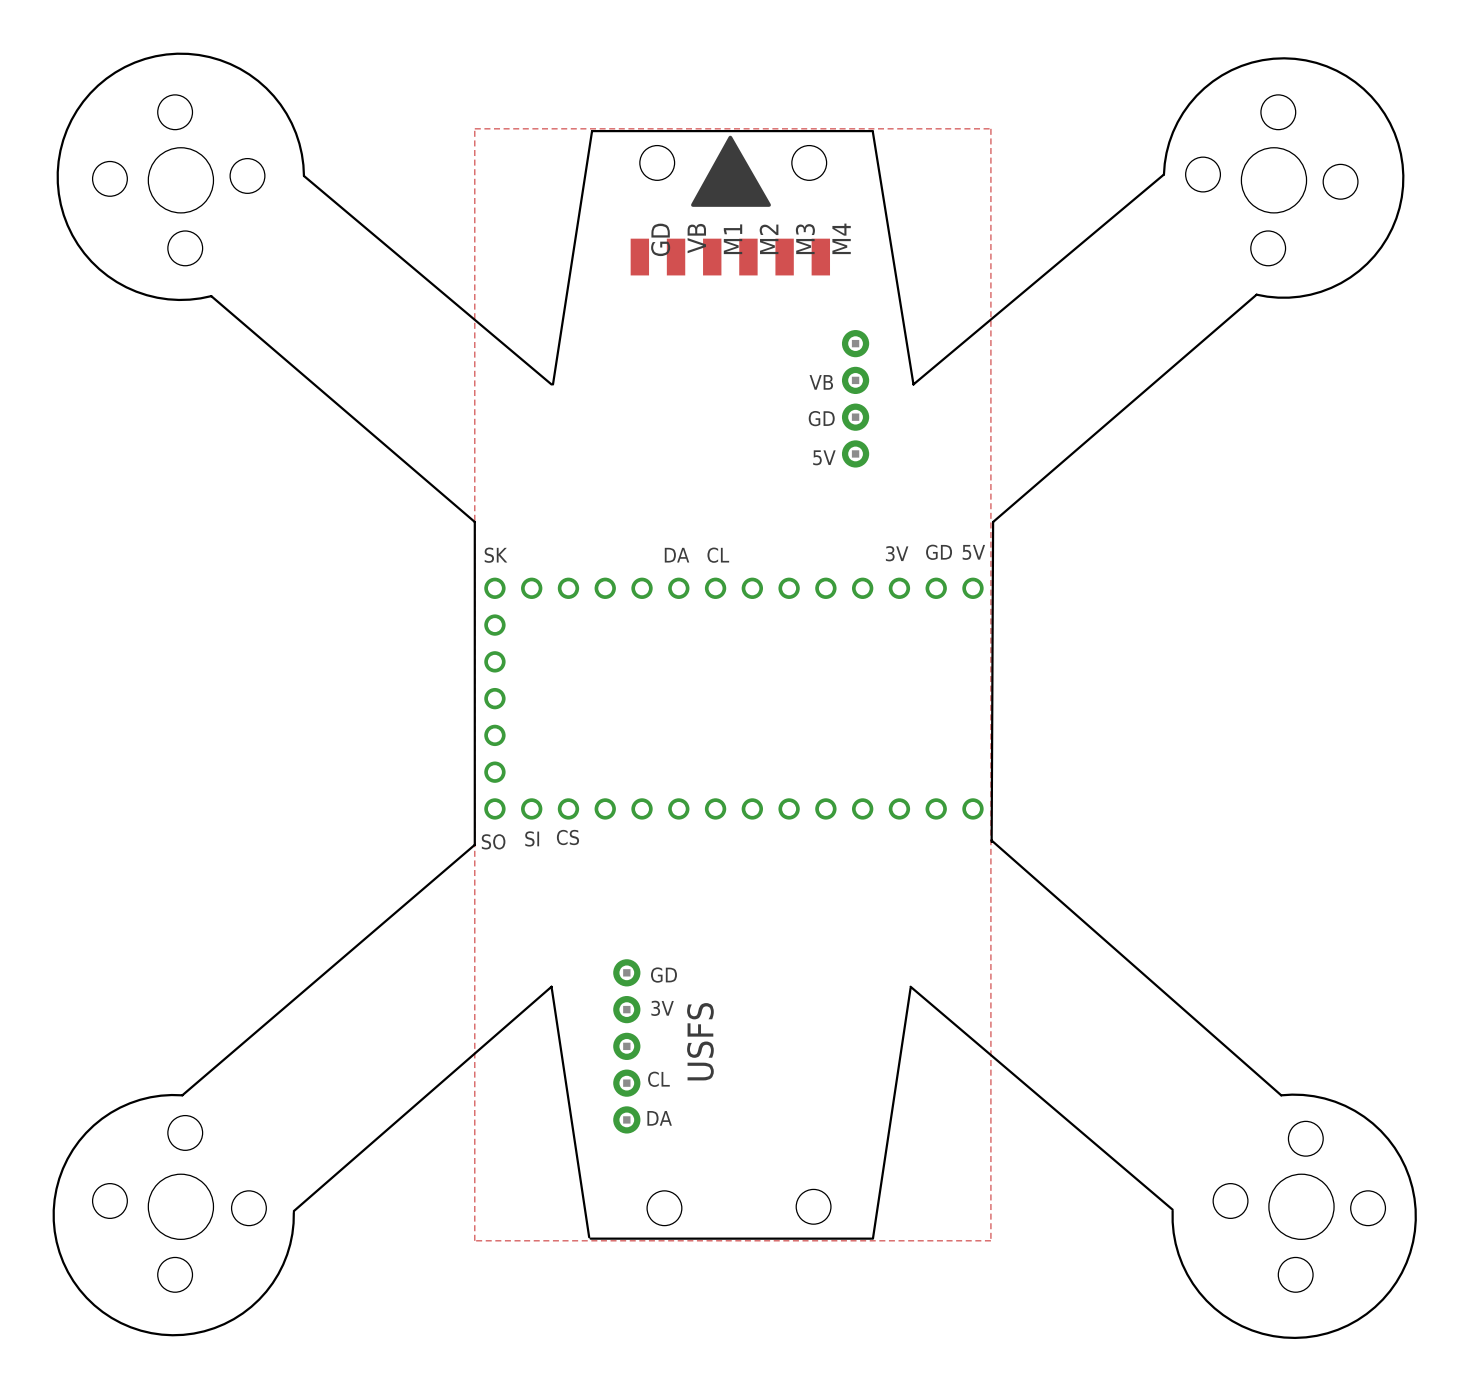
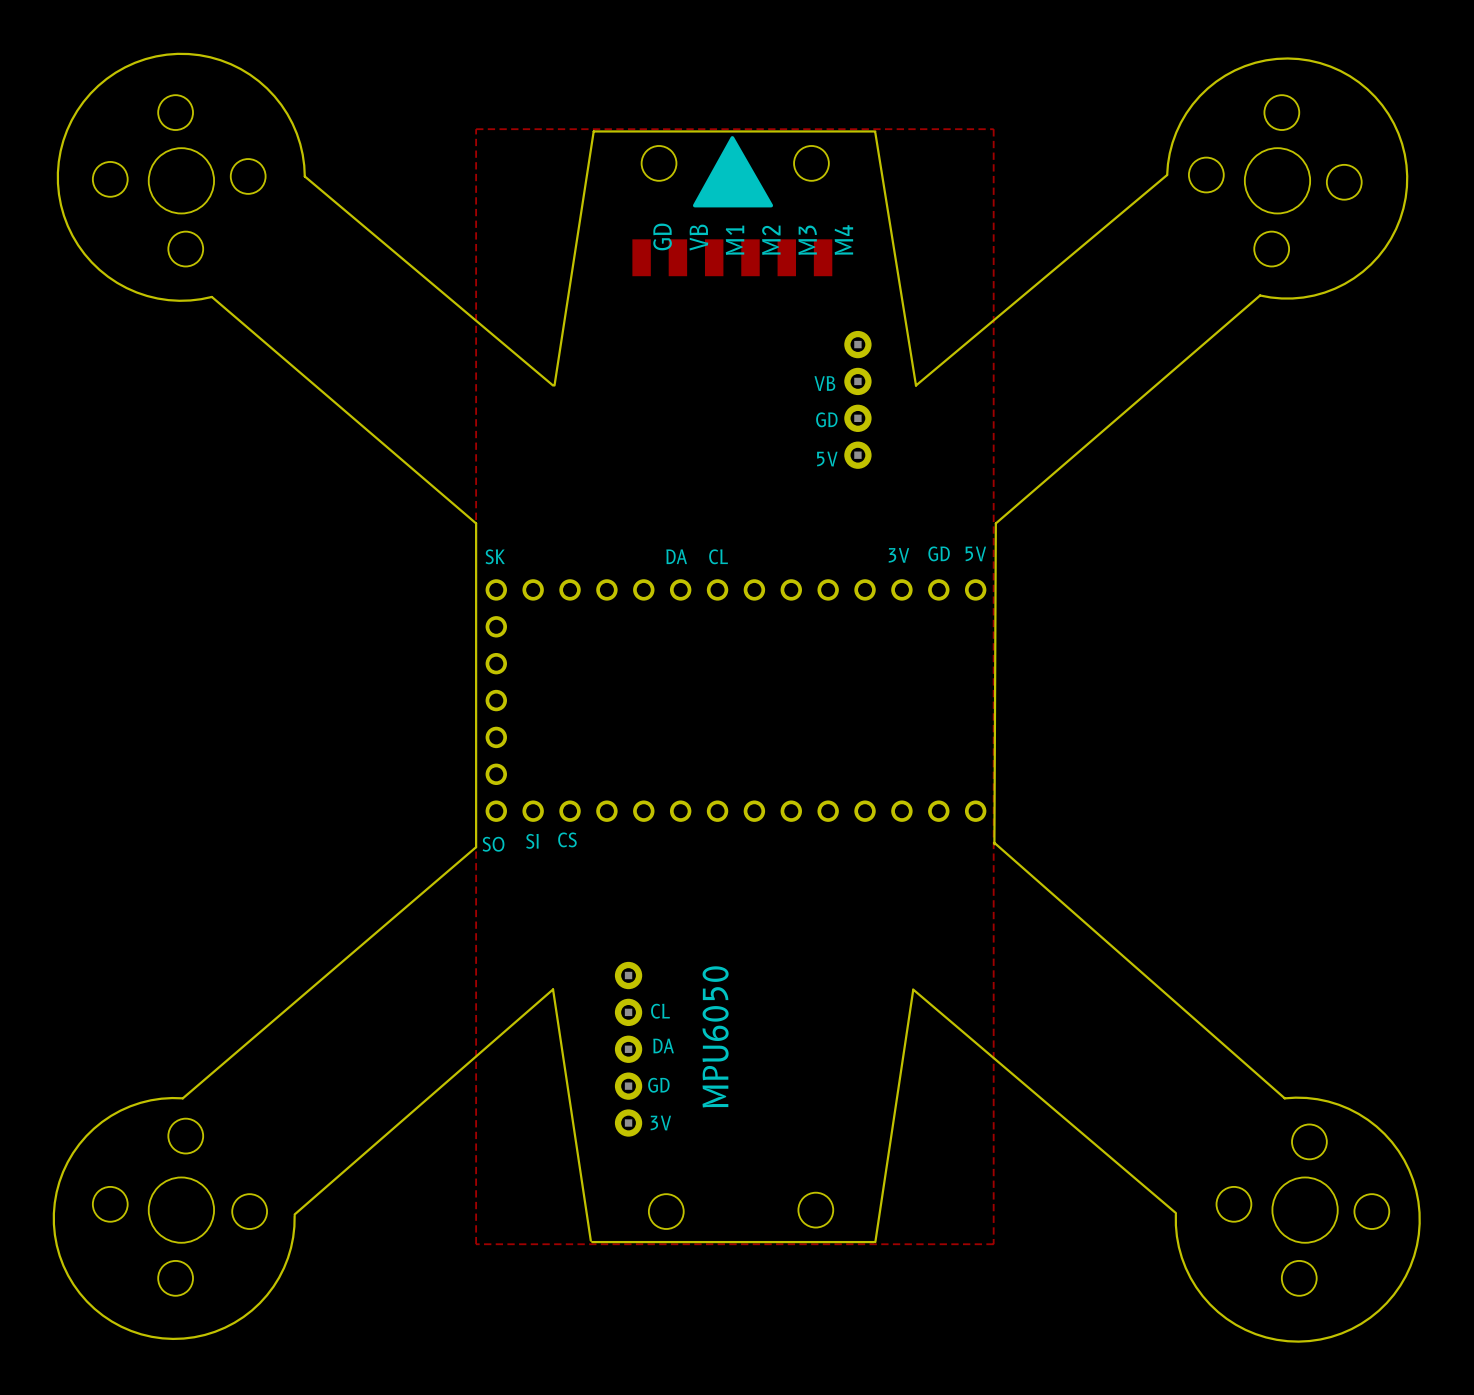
text position: GD (663, 975) -> GD (658, 1085)
text position: 3V (662, 1008) -> 3V (660, 1123)
text: none -> MPU6050 (715, 1036)
text: USFS (700, 1041) -> none
text position: CL (658, 1079) -> CL (660, 1011)
text position: DA (659, 1118) -> DA (663, 1045)

